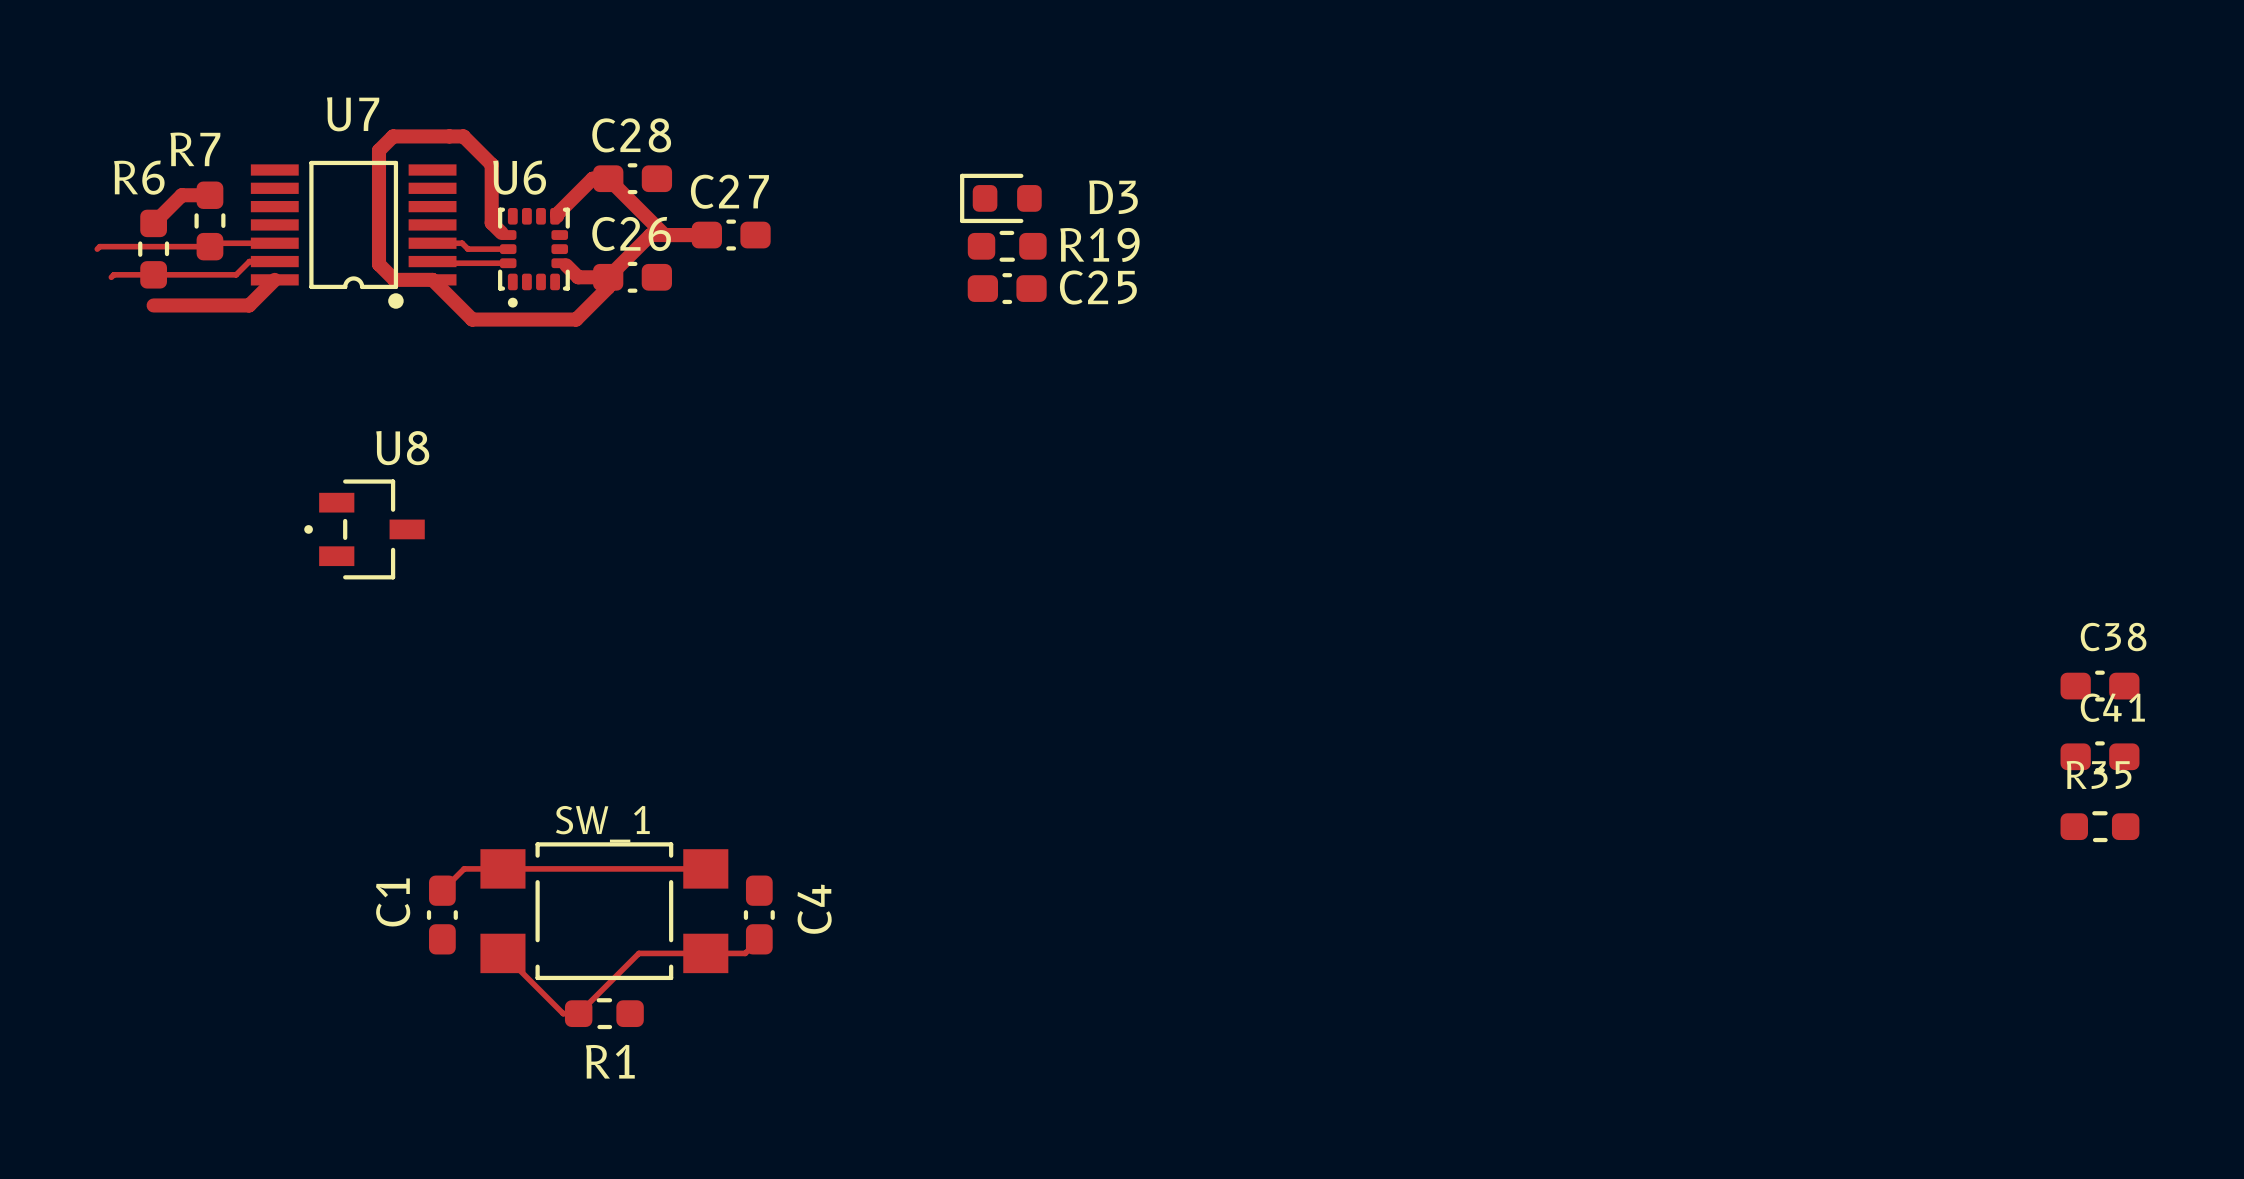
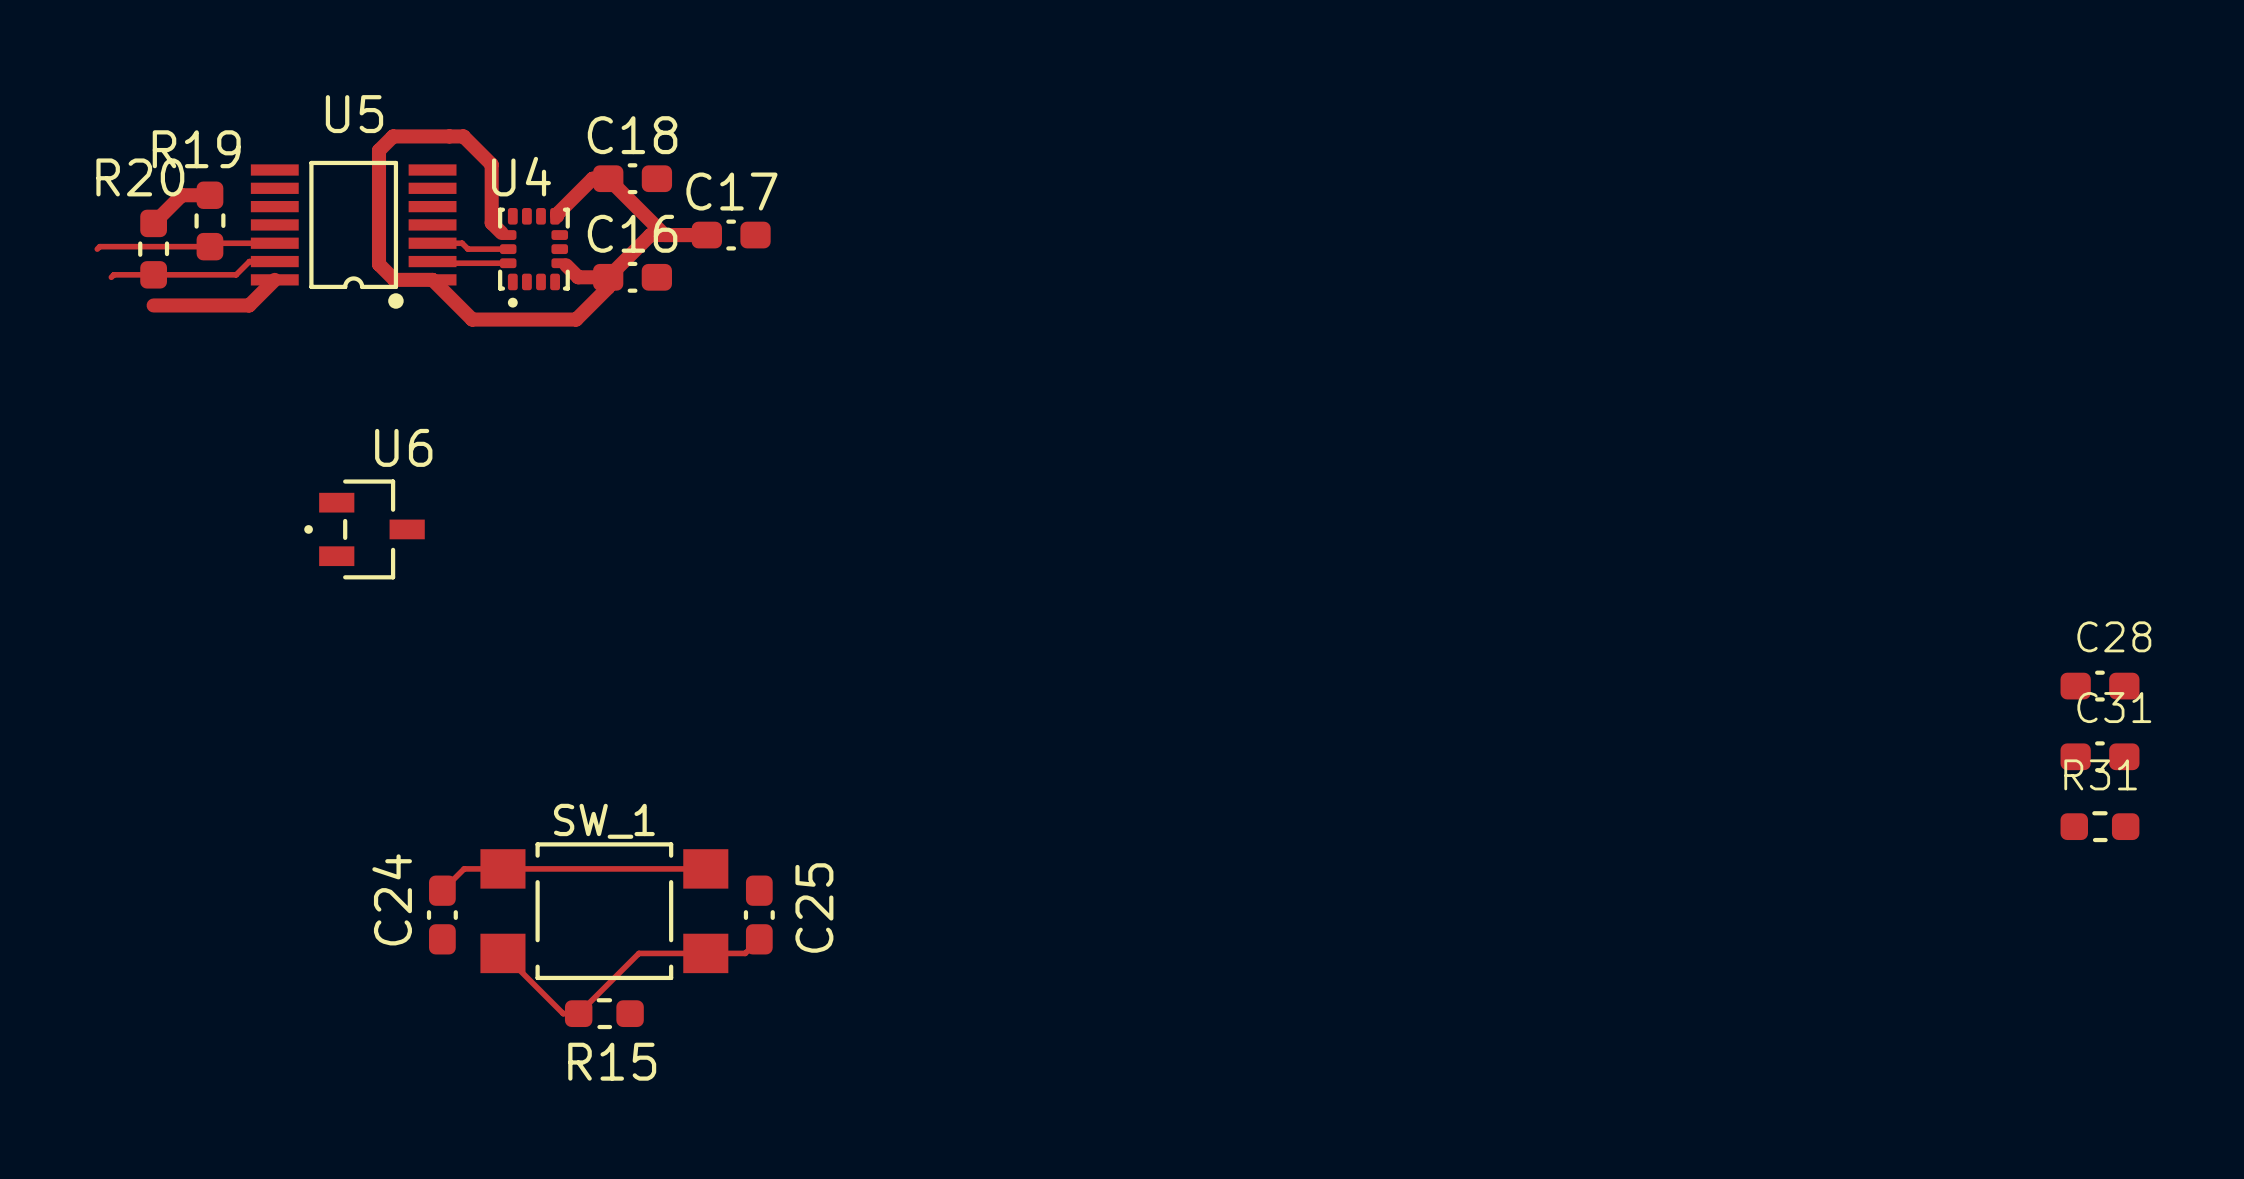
U7 name: U7 (353, 114) -> U5 (354, 114)
C28 name: C28 (631, 135) -> C18 (632, 135)
R7 name: R7 (195, 149) -> R19 (196, 149)
R6 name: R6 (139, 177) -> R20 (140, 177)
U6 name: U6 (519, 177) -> U4 (521, 176)
C27 name: C27 (729, 191) -> C17 (731, 191)
D3: (1000, 198) -> none
C26 name: C26 (631, 234) -> C16 (632, 233)
R19: (1007, 246) -> none
C25: (1007, 288) -> none
U8 name: U8 (402, 448) -> U6 (403, 447)
C38 name: C38 (2113, 637) -> C28 (2114, 636)
C41 name: C41 (2112, 707) -> C31 (2114, 707)
R35 name: R35 (2099, 774) -> R31 (2100, 774)
C1 name: C1 (393, 902) -> C24 (392, 899)
C4 name: C4 (814, 909) -> C25 (814, 908)
R1 name: R1 (610, 1061) -> R15 (612, 1061)

